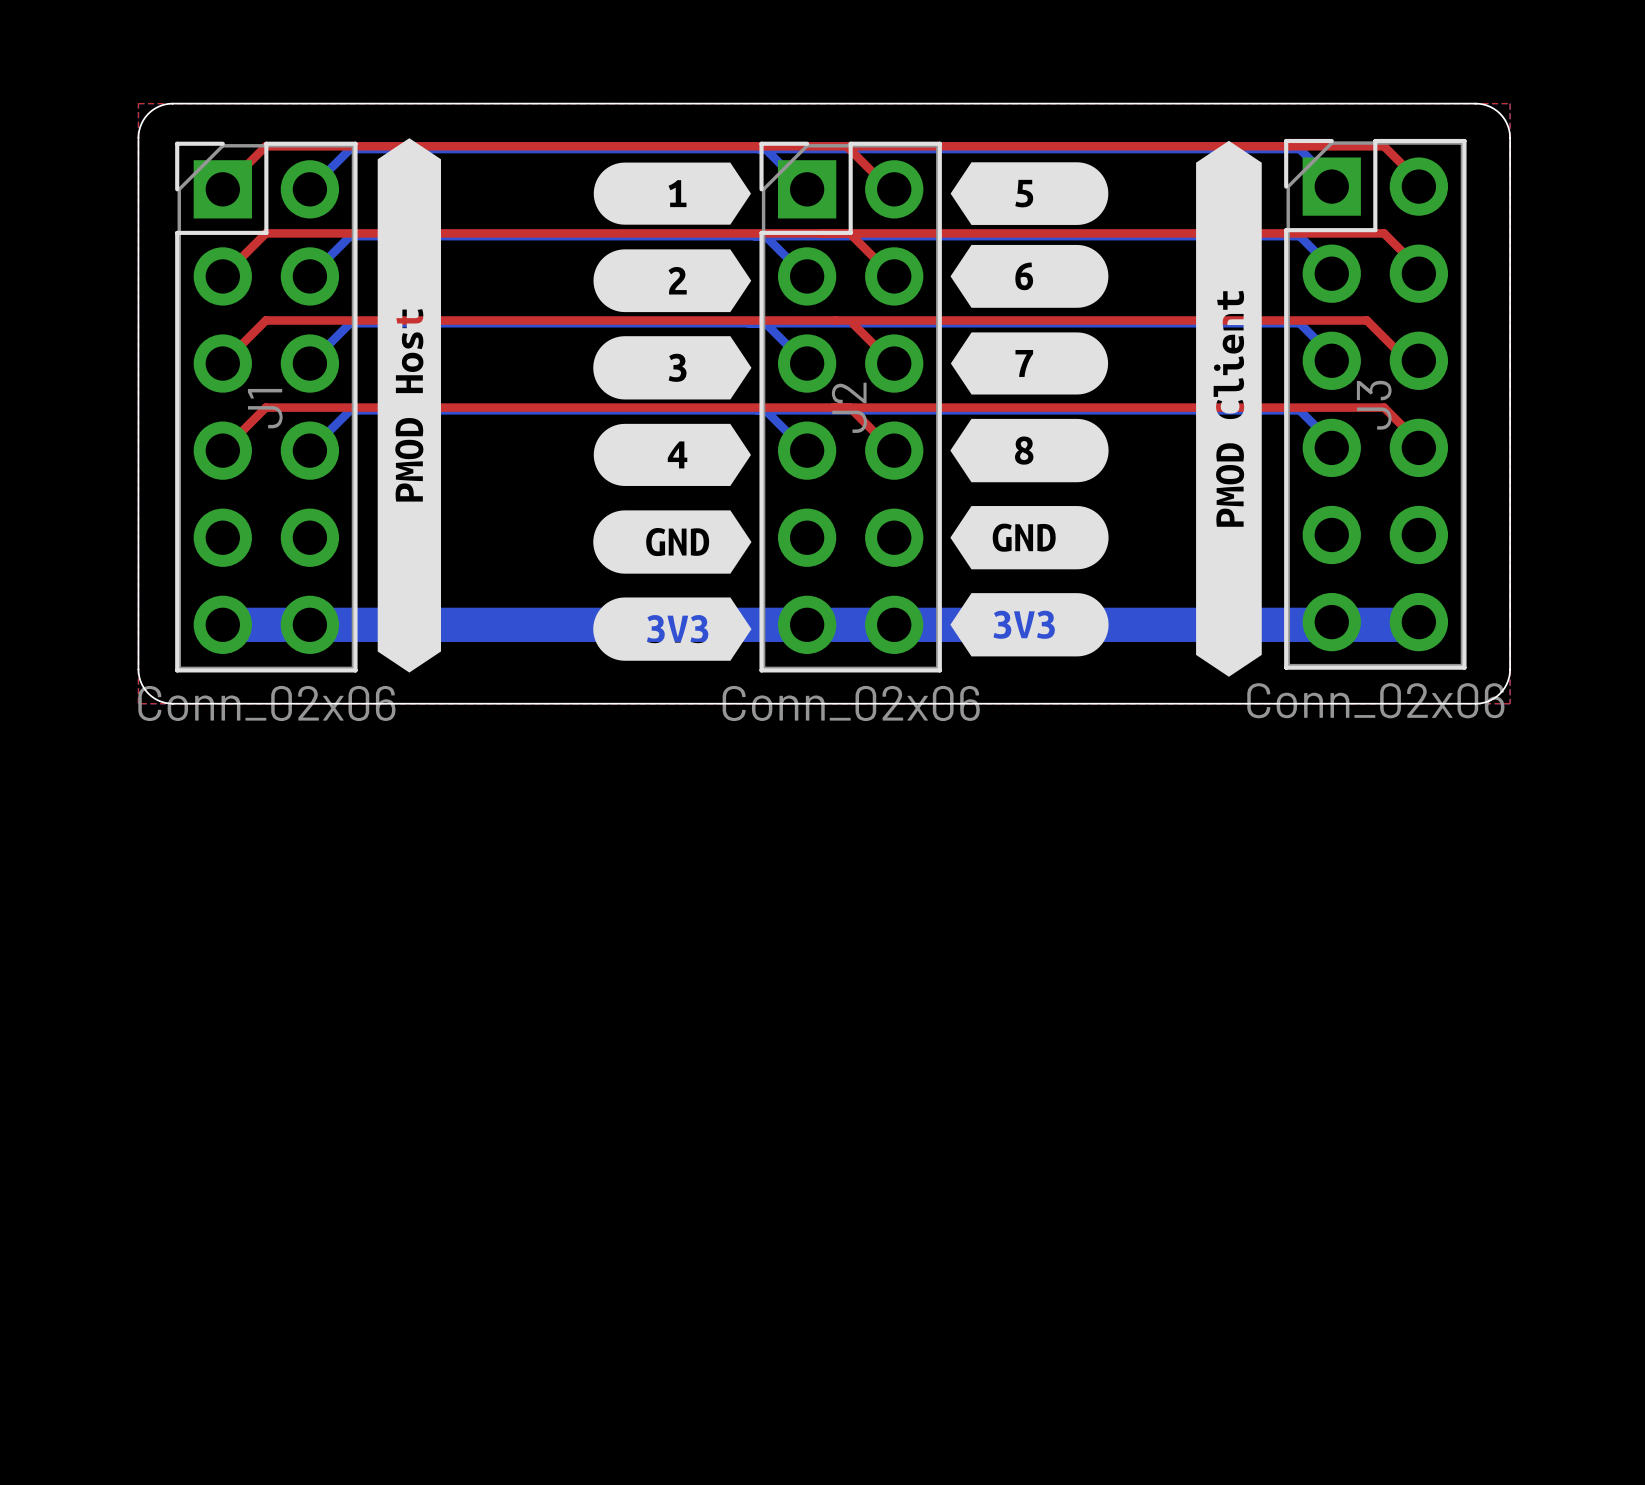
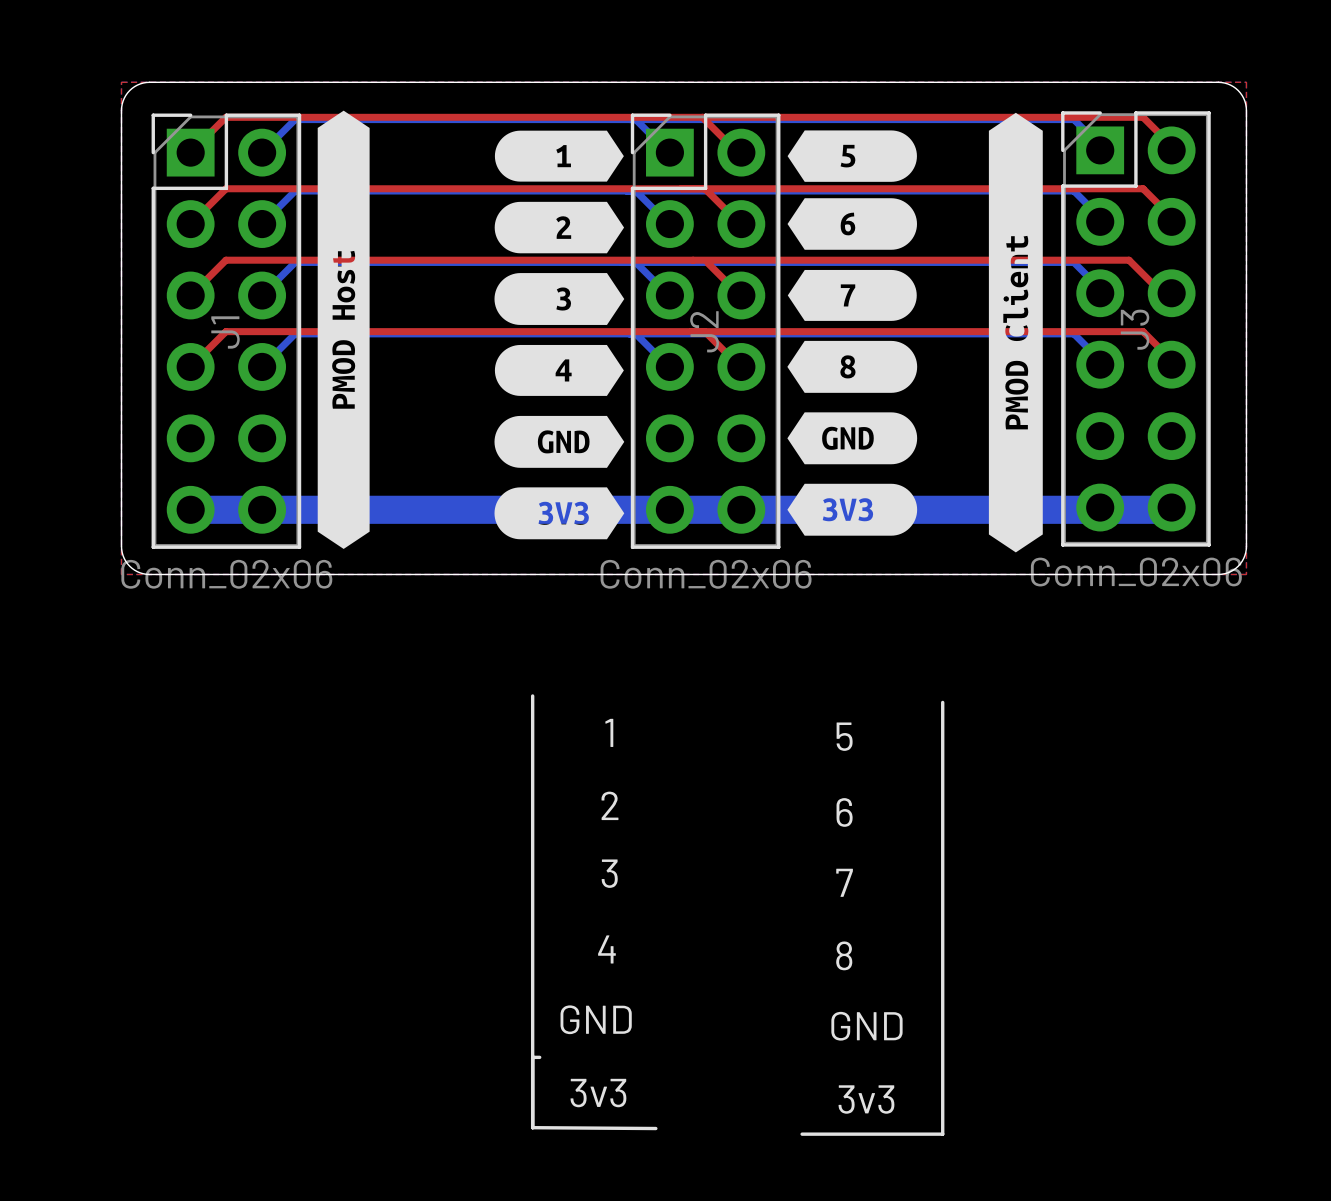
line: none -> (532, 695) (532, 1127) (655, 1128)
line: none -> (942, 702) (942, 1134) (802, 1134)
text: none -> 1 (609, 732)
text: none -> 5 (844, 736)
text: none -> 2 (609, 805)
text: none -> 6 (844, 812)
text: none -> 3 (609, 873)
text: none -> 7 (844, 882)
text: none -> 4 (606, 949)
text: none -> 8 (844, 955)
text: none -> GND (596, 1019)
text: none -> GND (866, 1026)
line: none -> (532, 1057) (539, 1057)
text: none -> 3v3 (598, 1093)
text: none -> 3v3 (866, 1099)

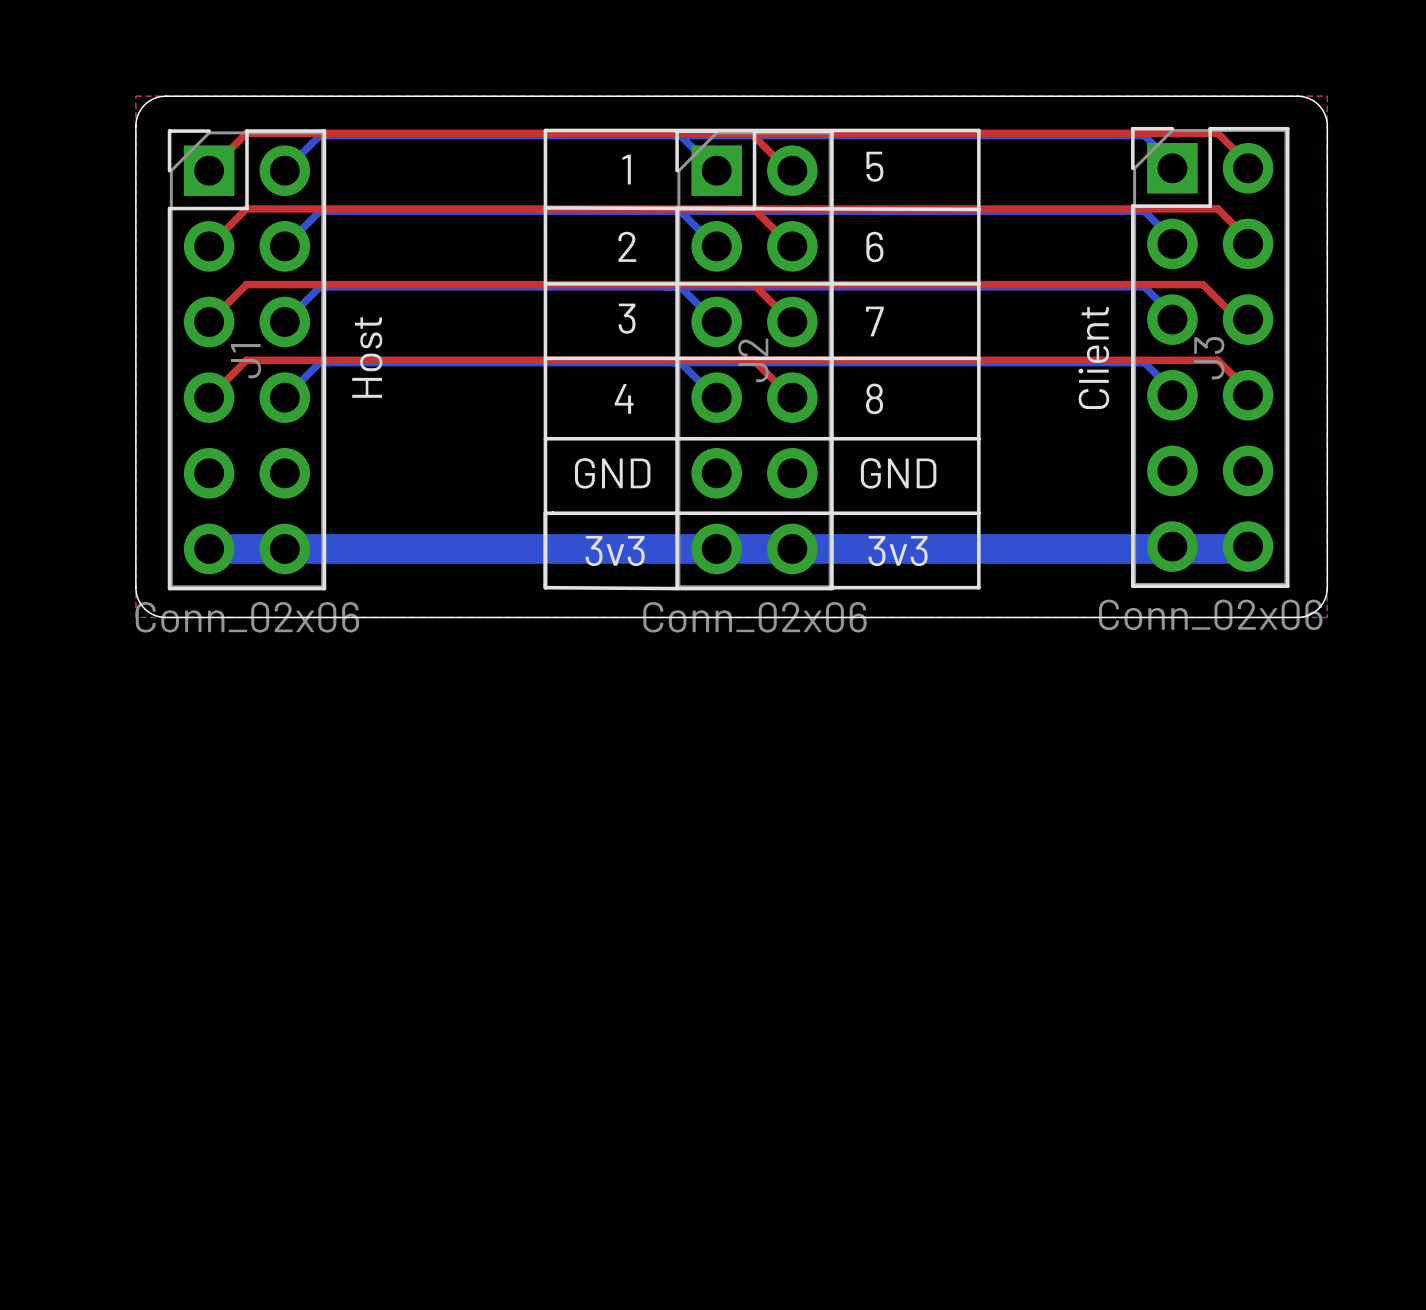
drawing: [317, 110, 370, 549] -> none
drawing: [988, 112, 1043, 553] -> none
drawing: [494, 130, 625, 540] -> none
drawing: [787, 130, 918, 536] -> none
line: none -> (545, 207) (978, 209)
line: none -> (546, 283) (978, 283)
text: none -> Host (367, 357)
line: none -> (546, 358) (978, 358)
text: none -> Client (1093, 358)
line: none -> (545, 438) (978, 438)
text: none -> GND (612, 473)
text: none -> GND (898, 473)
line: none -> (545, 513) (978, 513)
text: none -> 3v3 (615, 550)
text: none -> 3v3 (898, 550)
line: none -> (829, 587) (978, 587) (978, 130) (545, 130) (545, 587) (675, 588)
line: (532, 695) (532, 1127) (655, 1128) -> none
line: (942, 702) (942, 1134) (802, 1134) -> none
text position: 1 (609, 732) -> 1 (626, 169)
text position: 5 (844, 736) -> 5 (874, 166)
text position: 2 (609, 805) -> 2 (627, 246)
text position: 6 (844, 812) -> 6 (874, 246)
text position: 3 (609, 873) -> 3 (627, 318)
text position: 7 (844, 882) -> 7 (874, 321)
text position: 4 (606, 949) -> 4 (624, 398)
text position: 8 (844, 955) -> 8 (874, 398)
text: GND (596, 1019) -> none
text: GND (866, 1026) -> none
line: (532, 1057) (539, 1057) -> none
text: 3v3 (598, 1093) -> none
text: 3v3 (866, 1099) -> none

